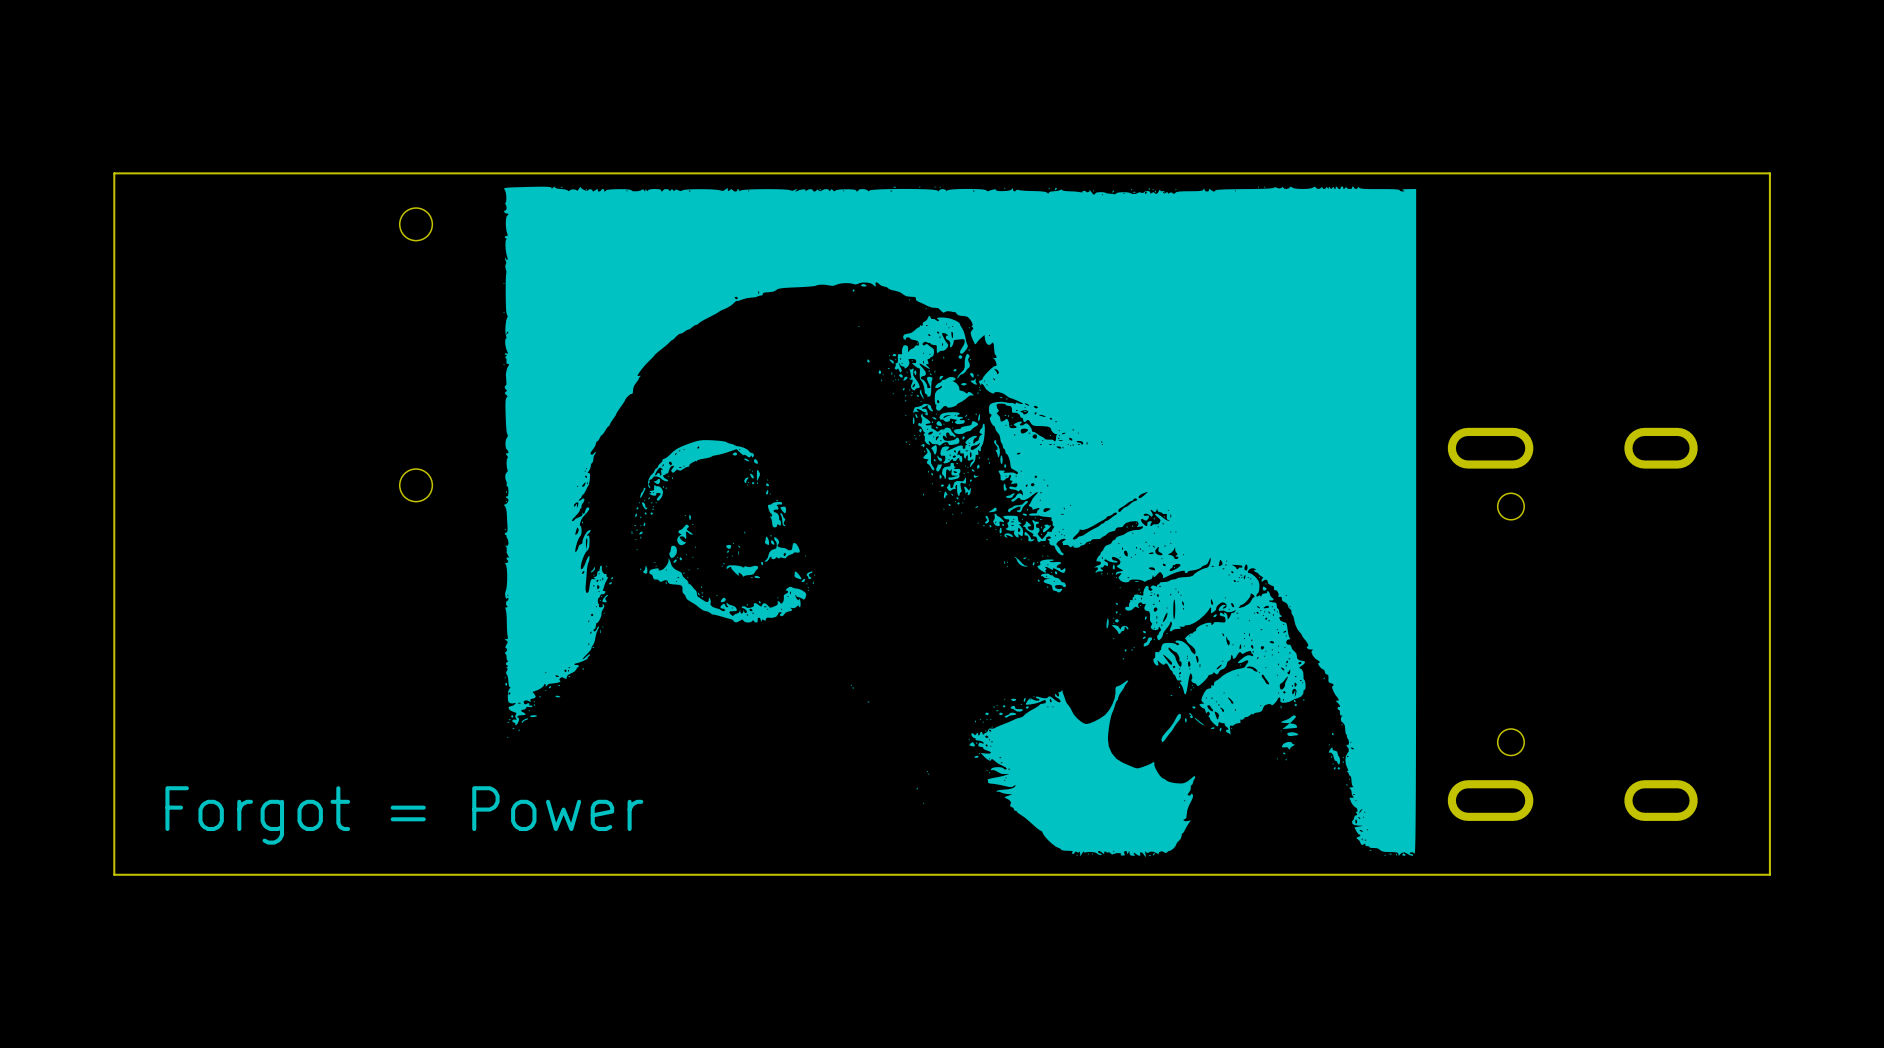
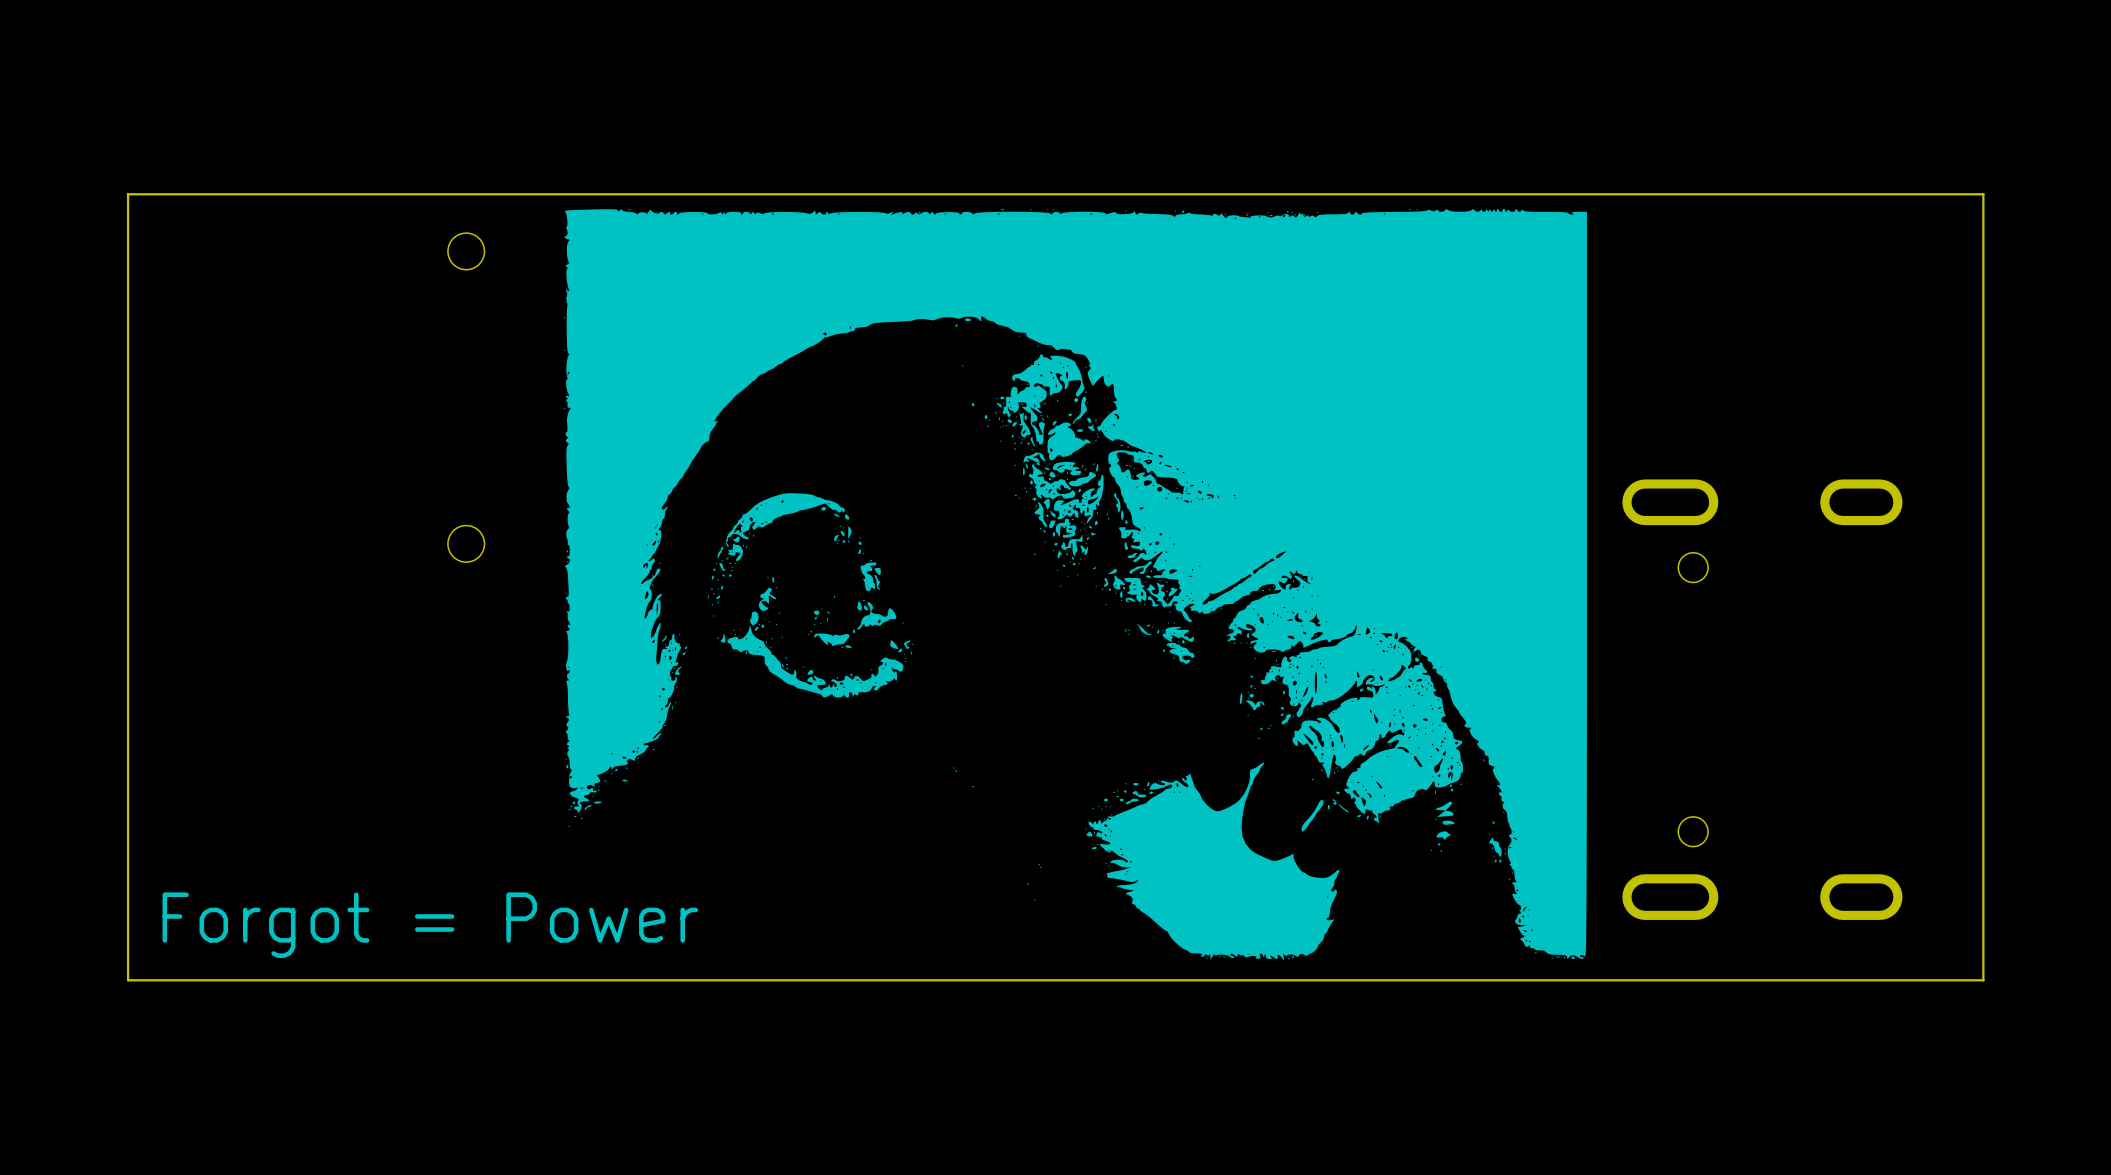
text position: Forgot = Power (404, 815) -> Forgot = Power (430, 925)

